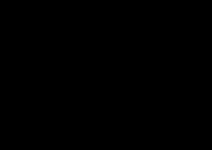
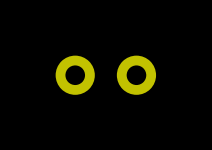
part: none -> (105, 75)

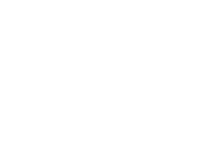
part: (105, 75) -> none

